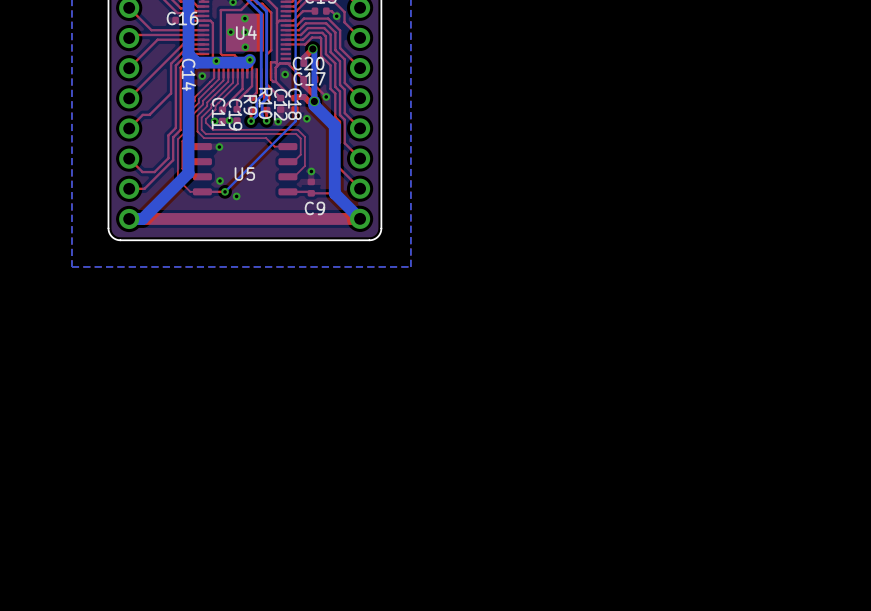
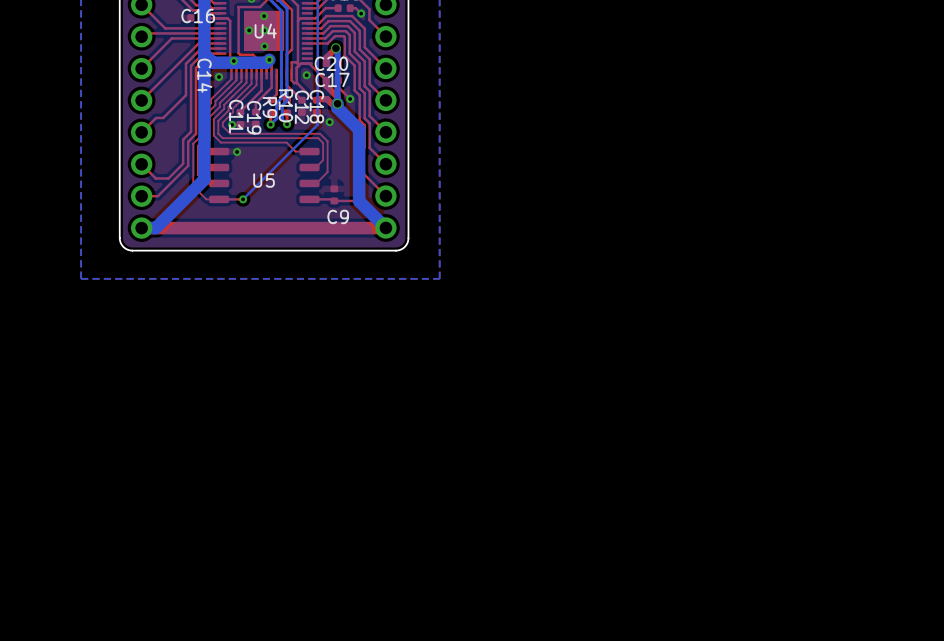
via: (229, 120) -> none
via: (278, 121) -> none
via: (311, 171) -> none
via: (220, 180) -> none
via: (236, 196) -> none

